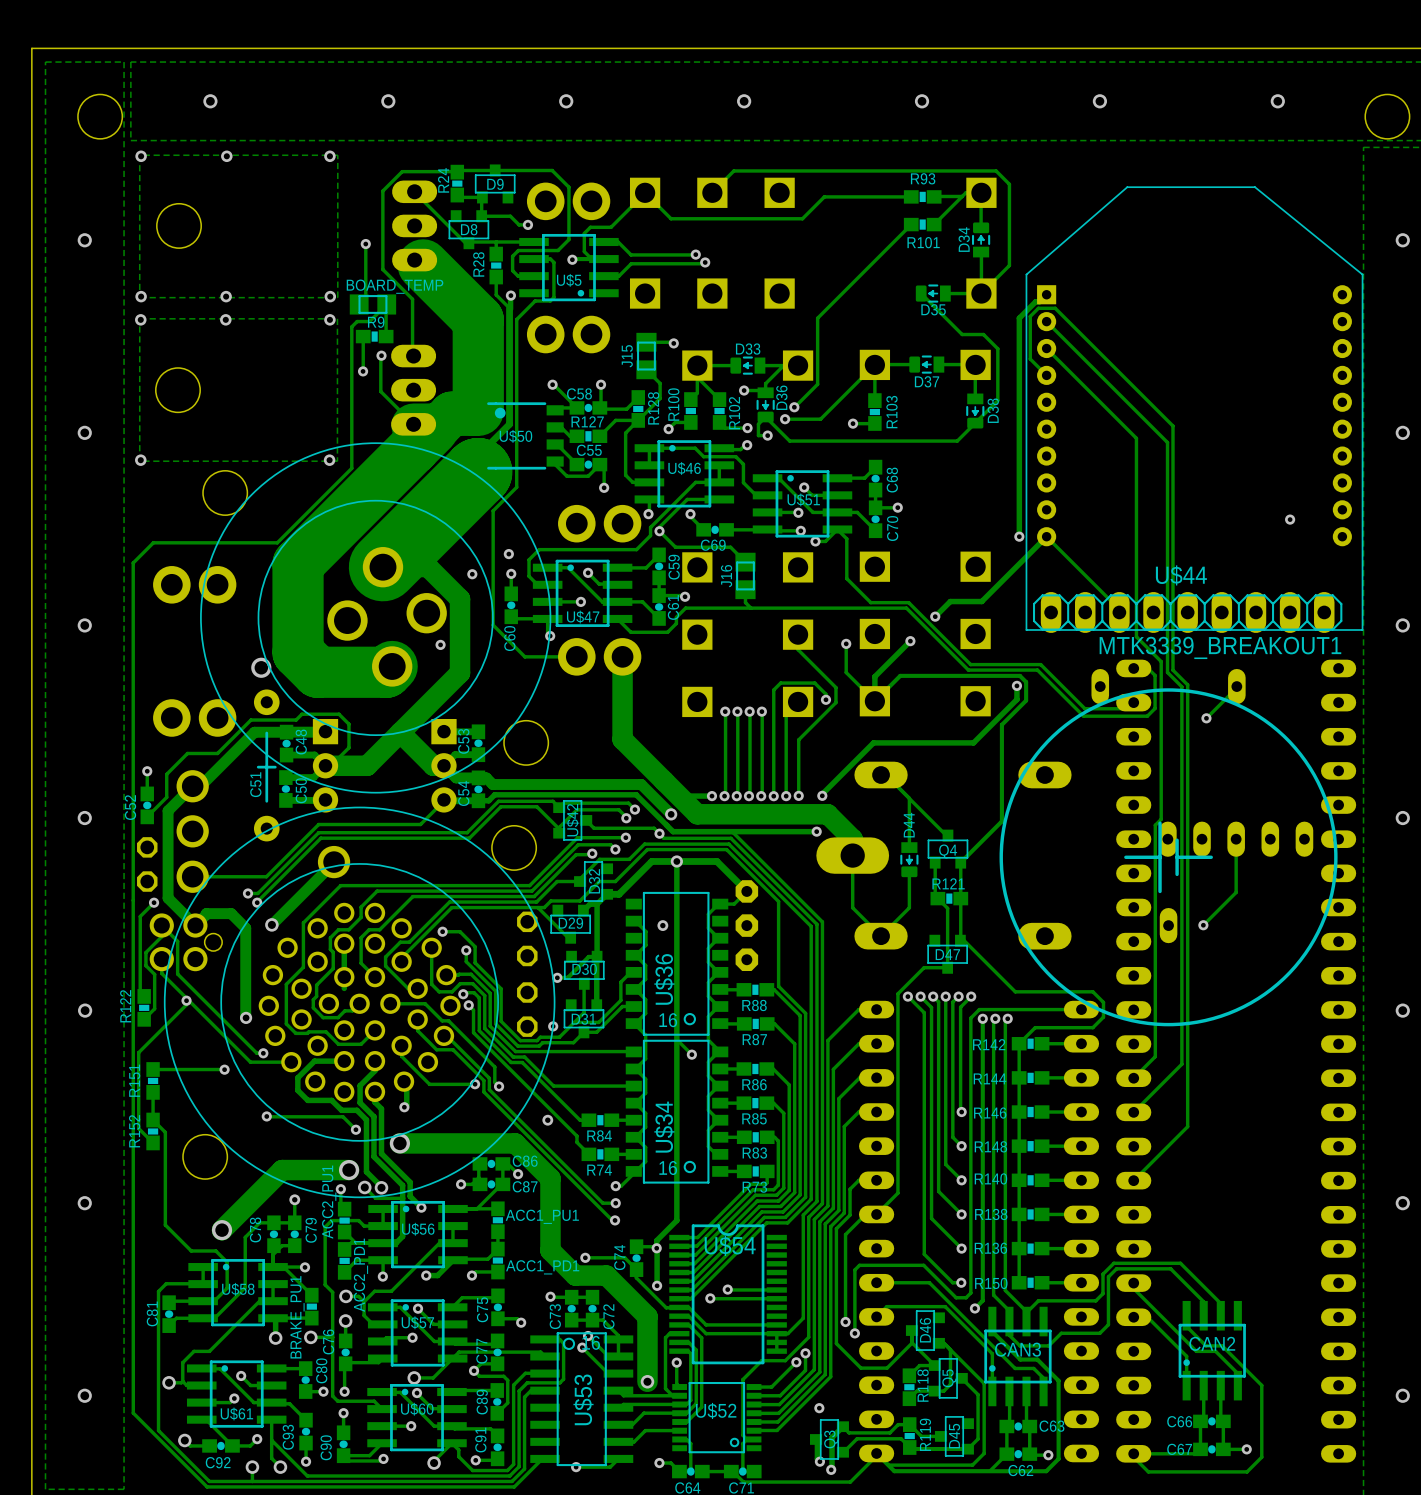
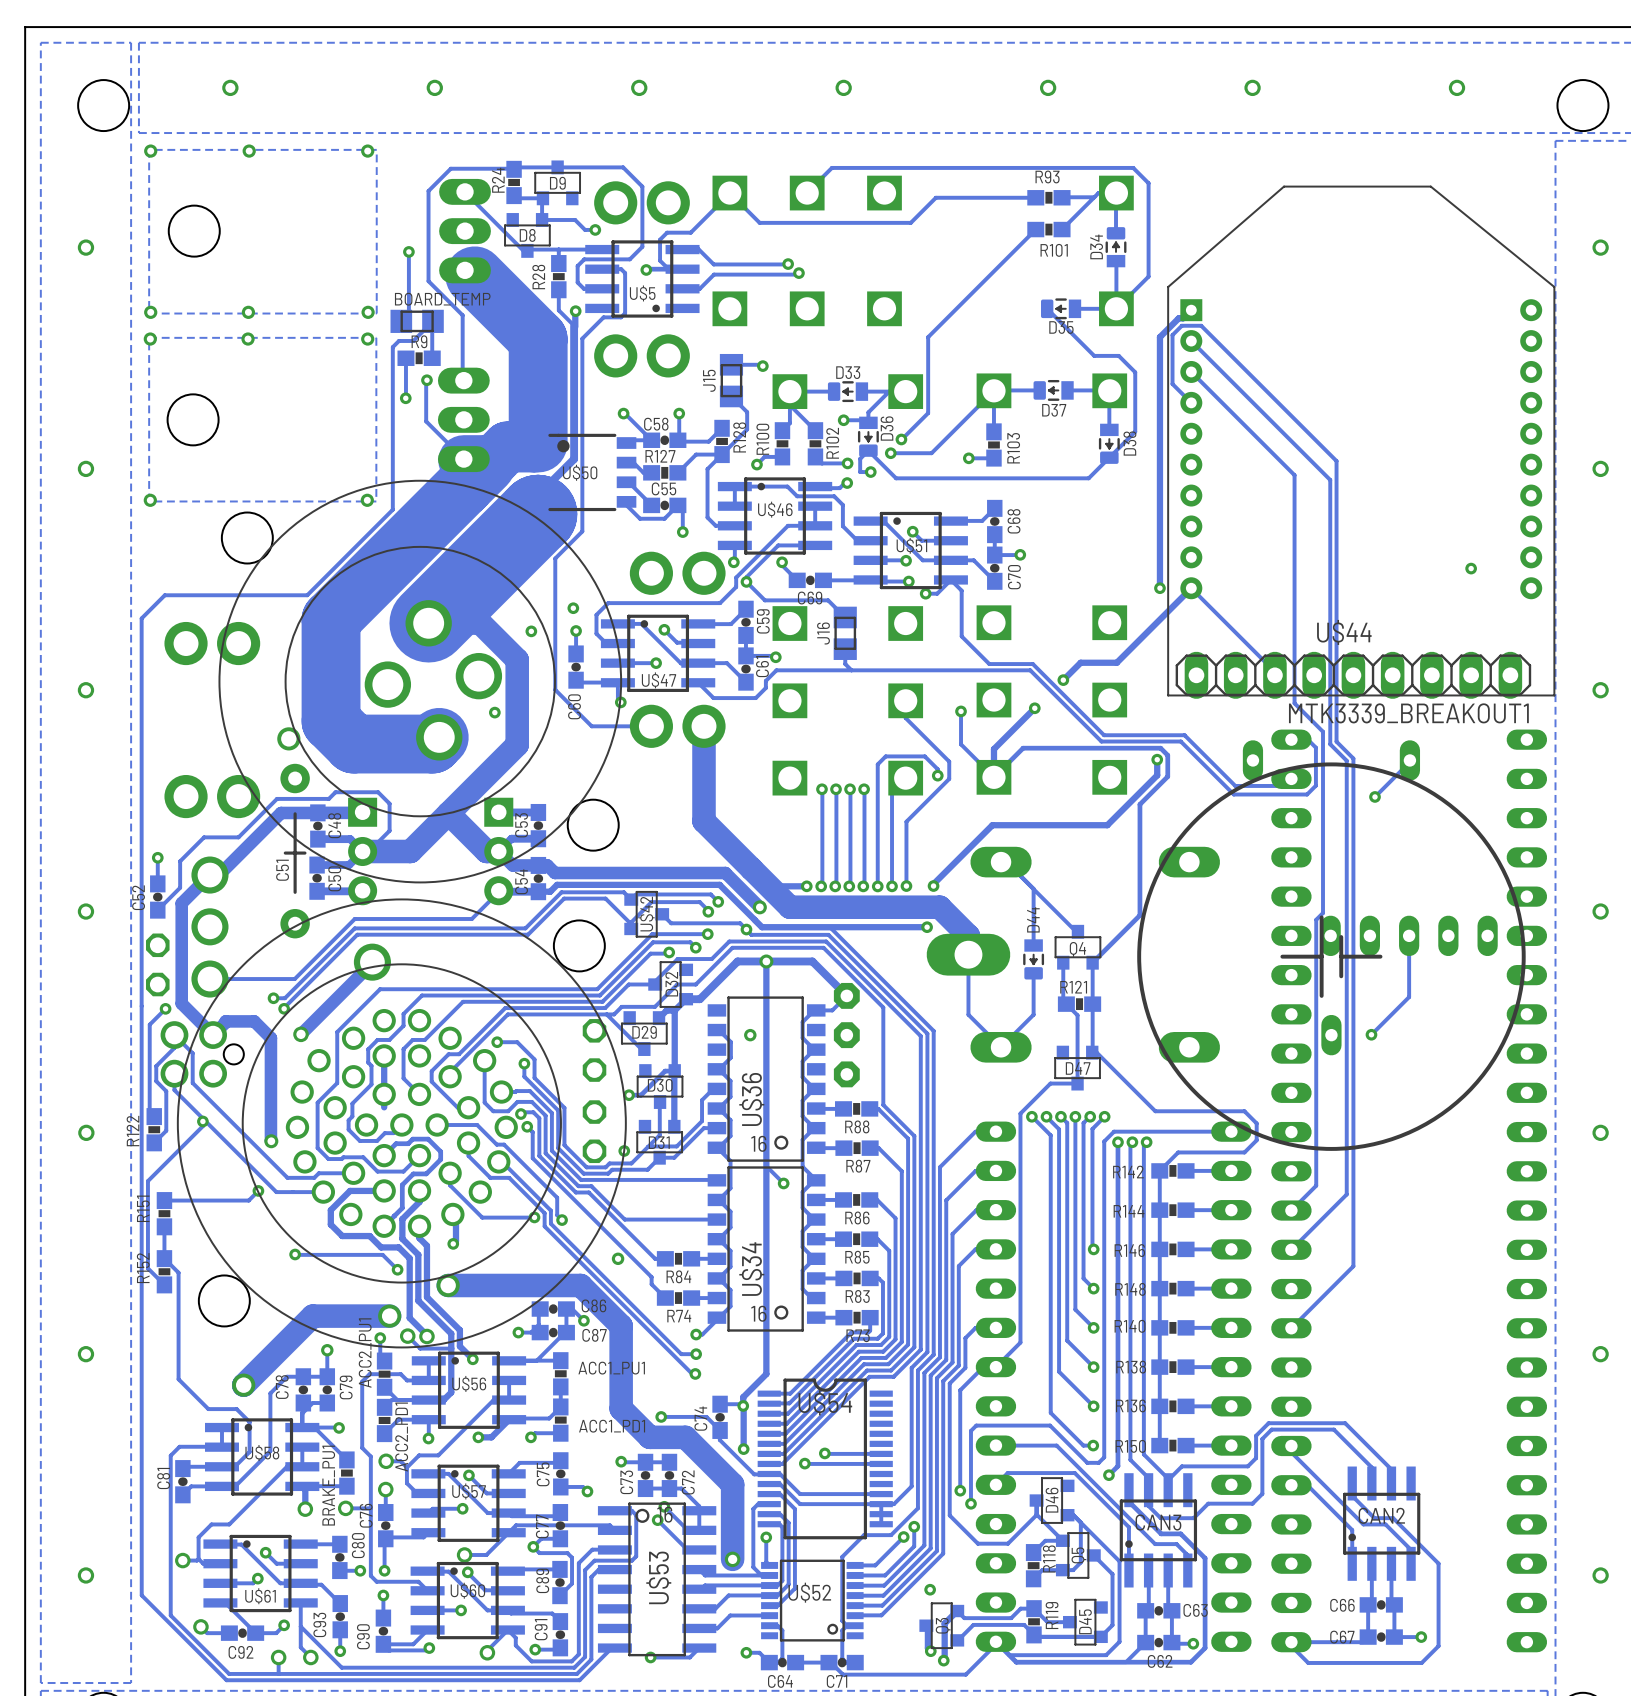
track: (177, 967) (177, 974) (256, 1053) (263, 1053) -> (192, 1083) (287, 1177) (314, 1177) (318, 1173) (353, 1173)
track: none -> (384, 1155) (396, 1143) (408, 1143) (412, 1139) (428, 1139) (440, 1151) (440, 1159) (426, 1173) (413, 1173) (402, 1184) (402, 1208) (384, 1226)
via: (263, 1053) -> none
track: none -> (258, 1190) (246, 1200)
via position: (224, 1069) -> (258, 1190)

